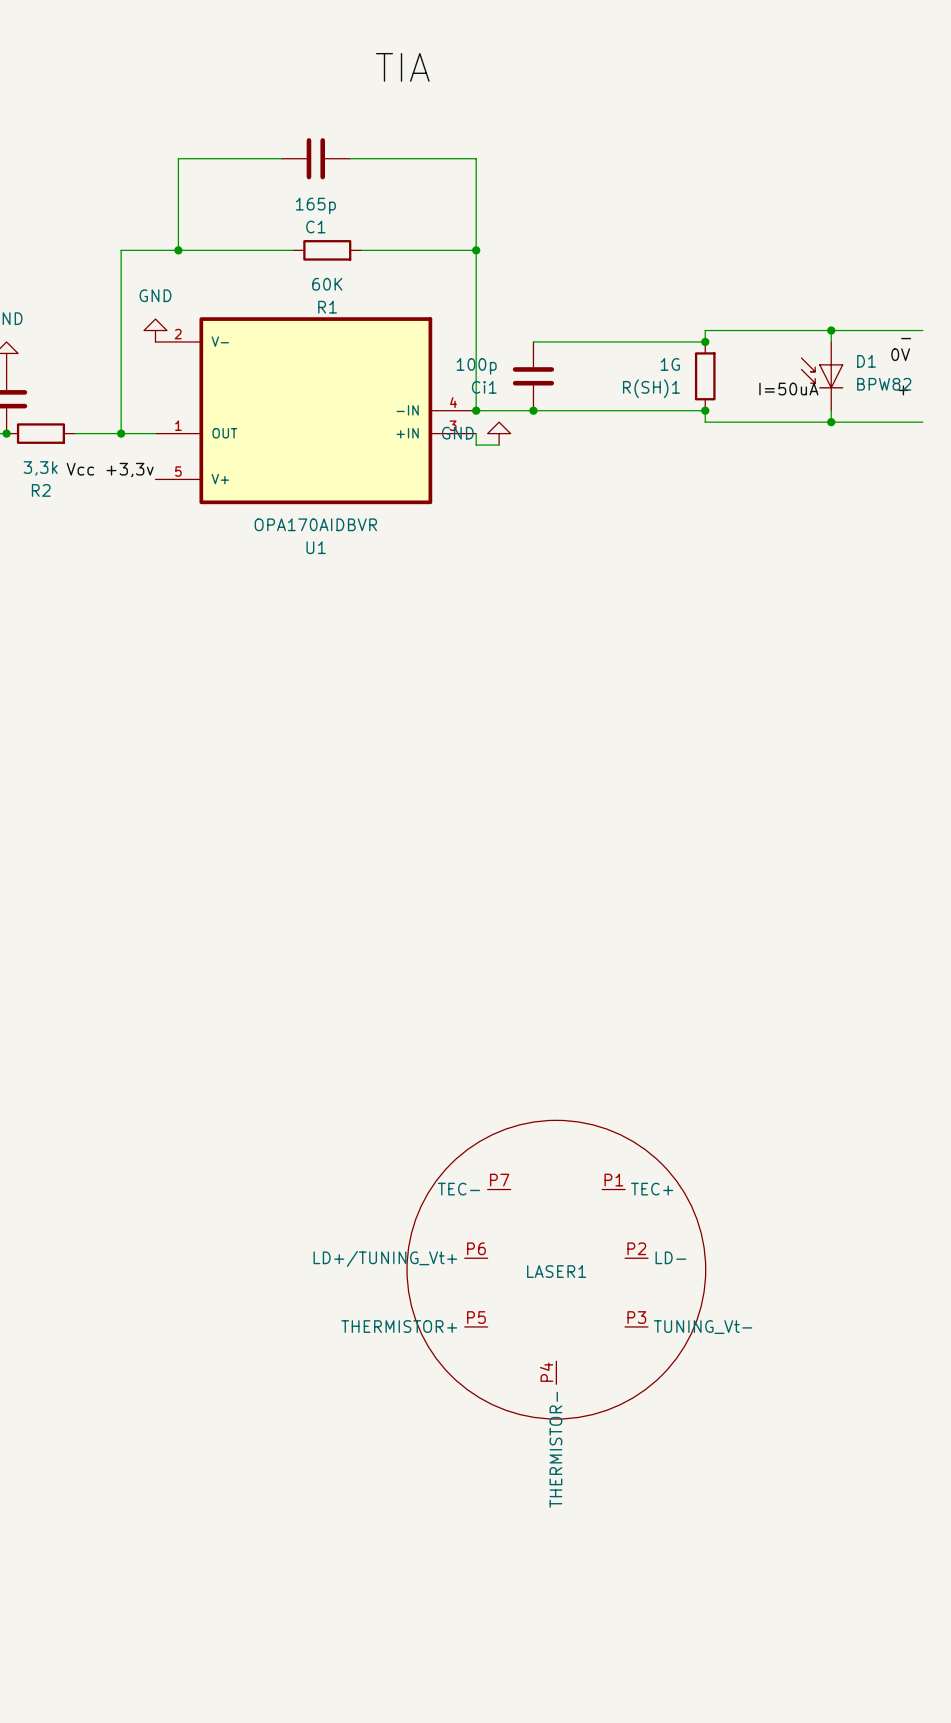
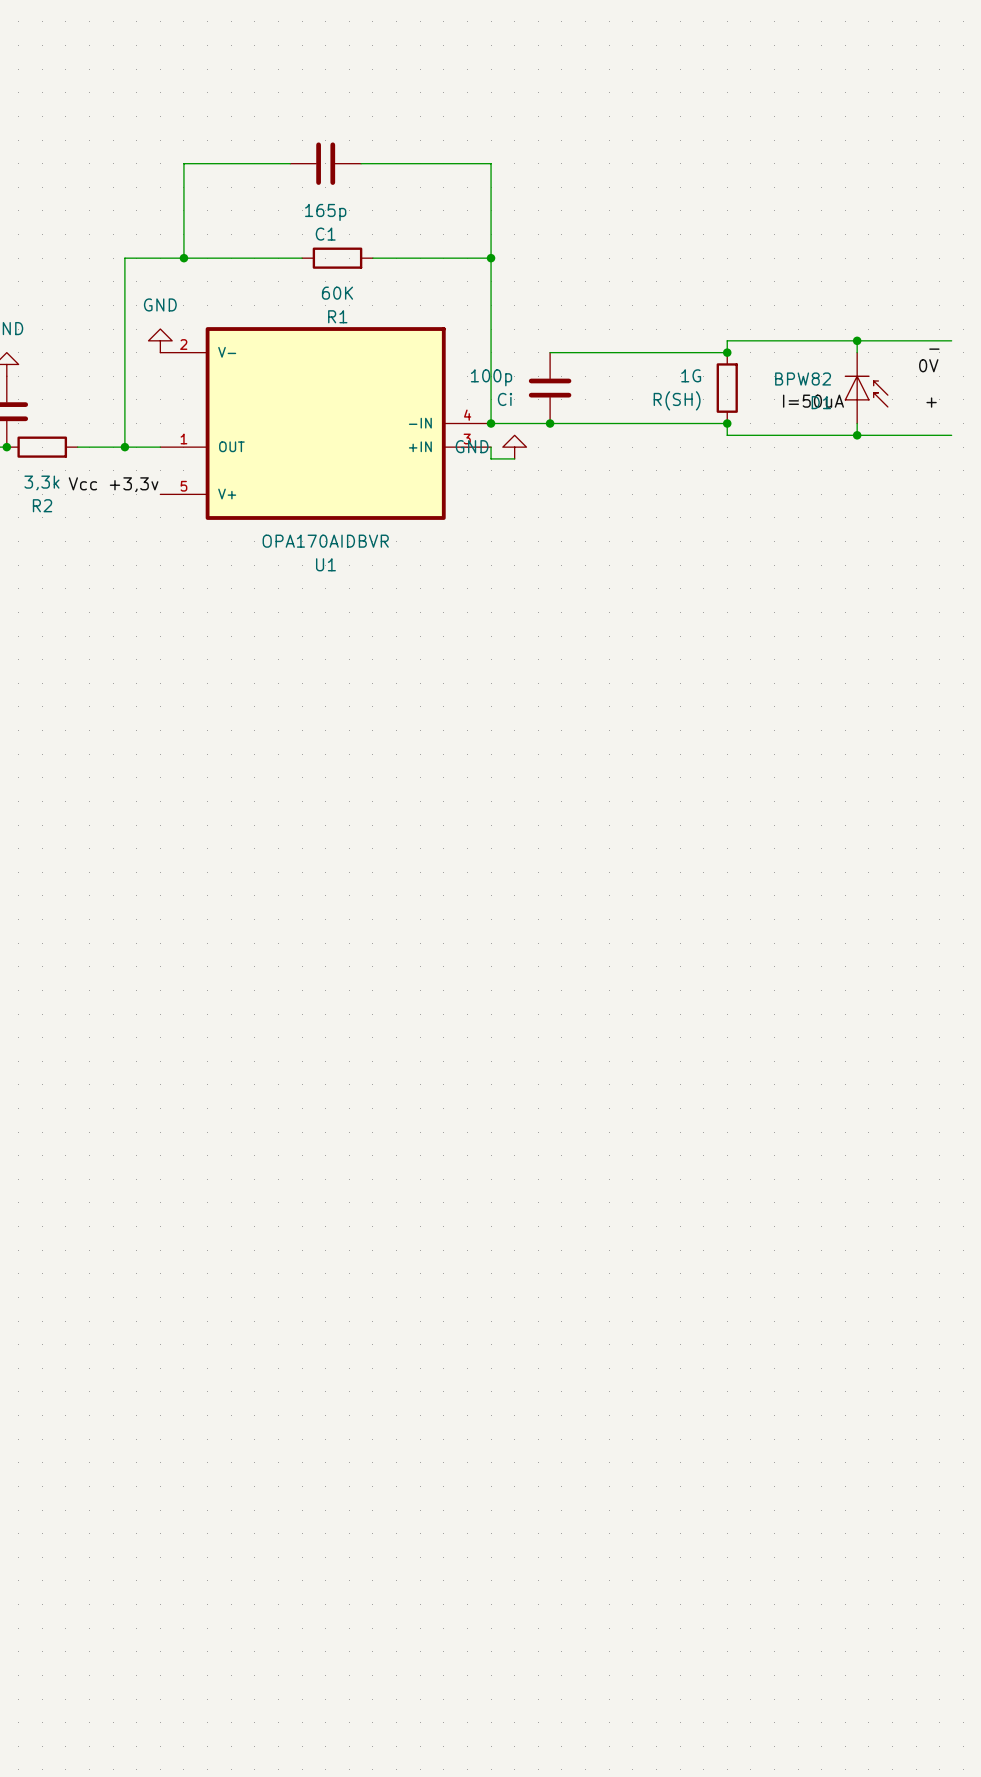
label: TIA (402, 67) -> none
D1 rotation: 0° (822, 373) -> 180° (866, 391)
Ci1 name: Ci1 (484, 387) -> Ci (505, 399)
R(SH)1 name: R(SH)1 (651, 388) -> R(SH) (677, 400)
LASER1: (556, 1269) -> none

